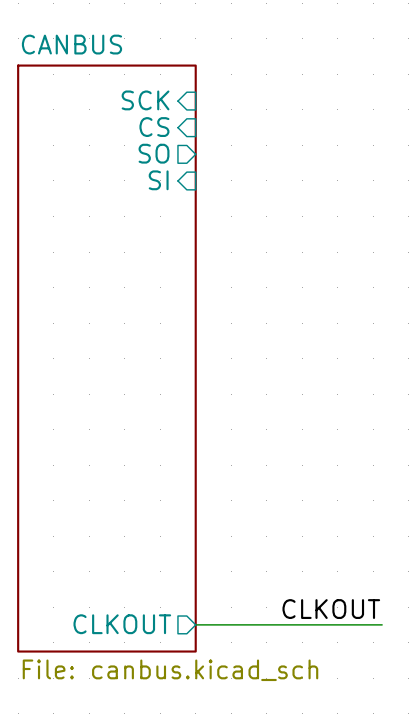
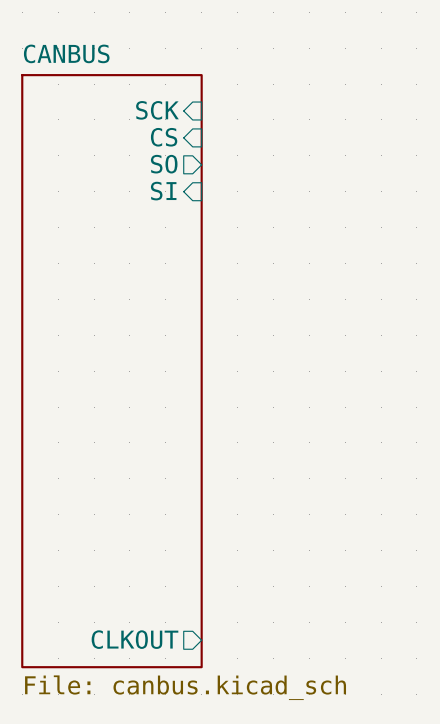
label: CLKOUT (331, 609) -> none
wire: (195, 624) (382, 624) -> none

